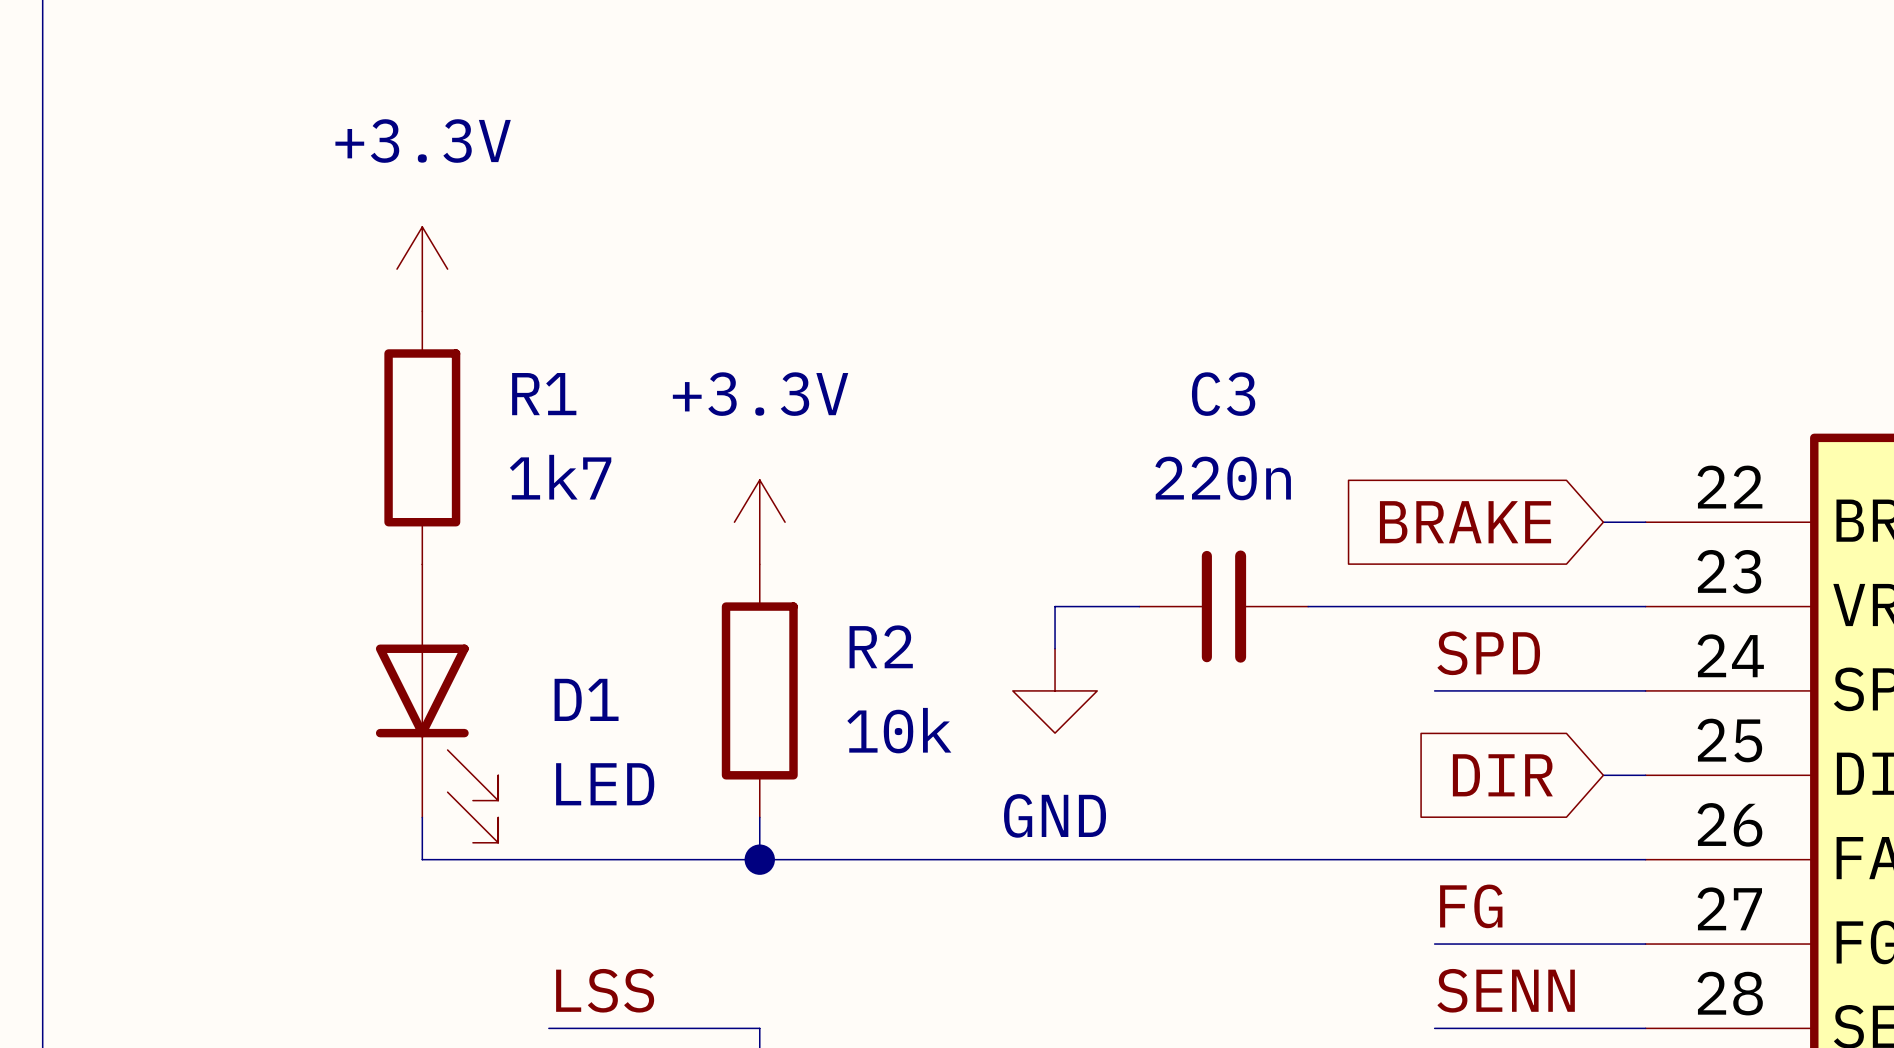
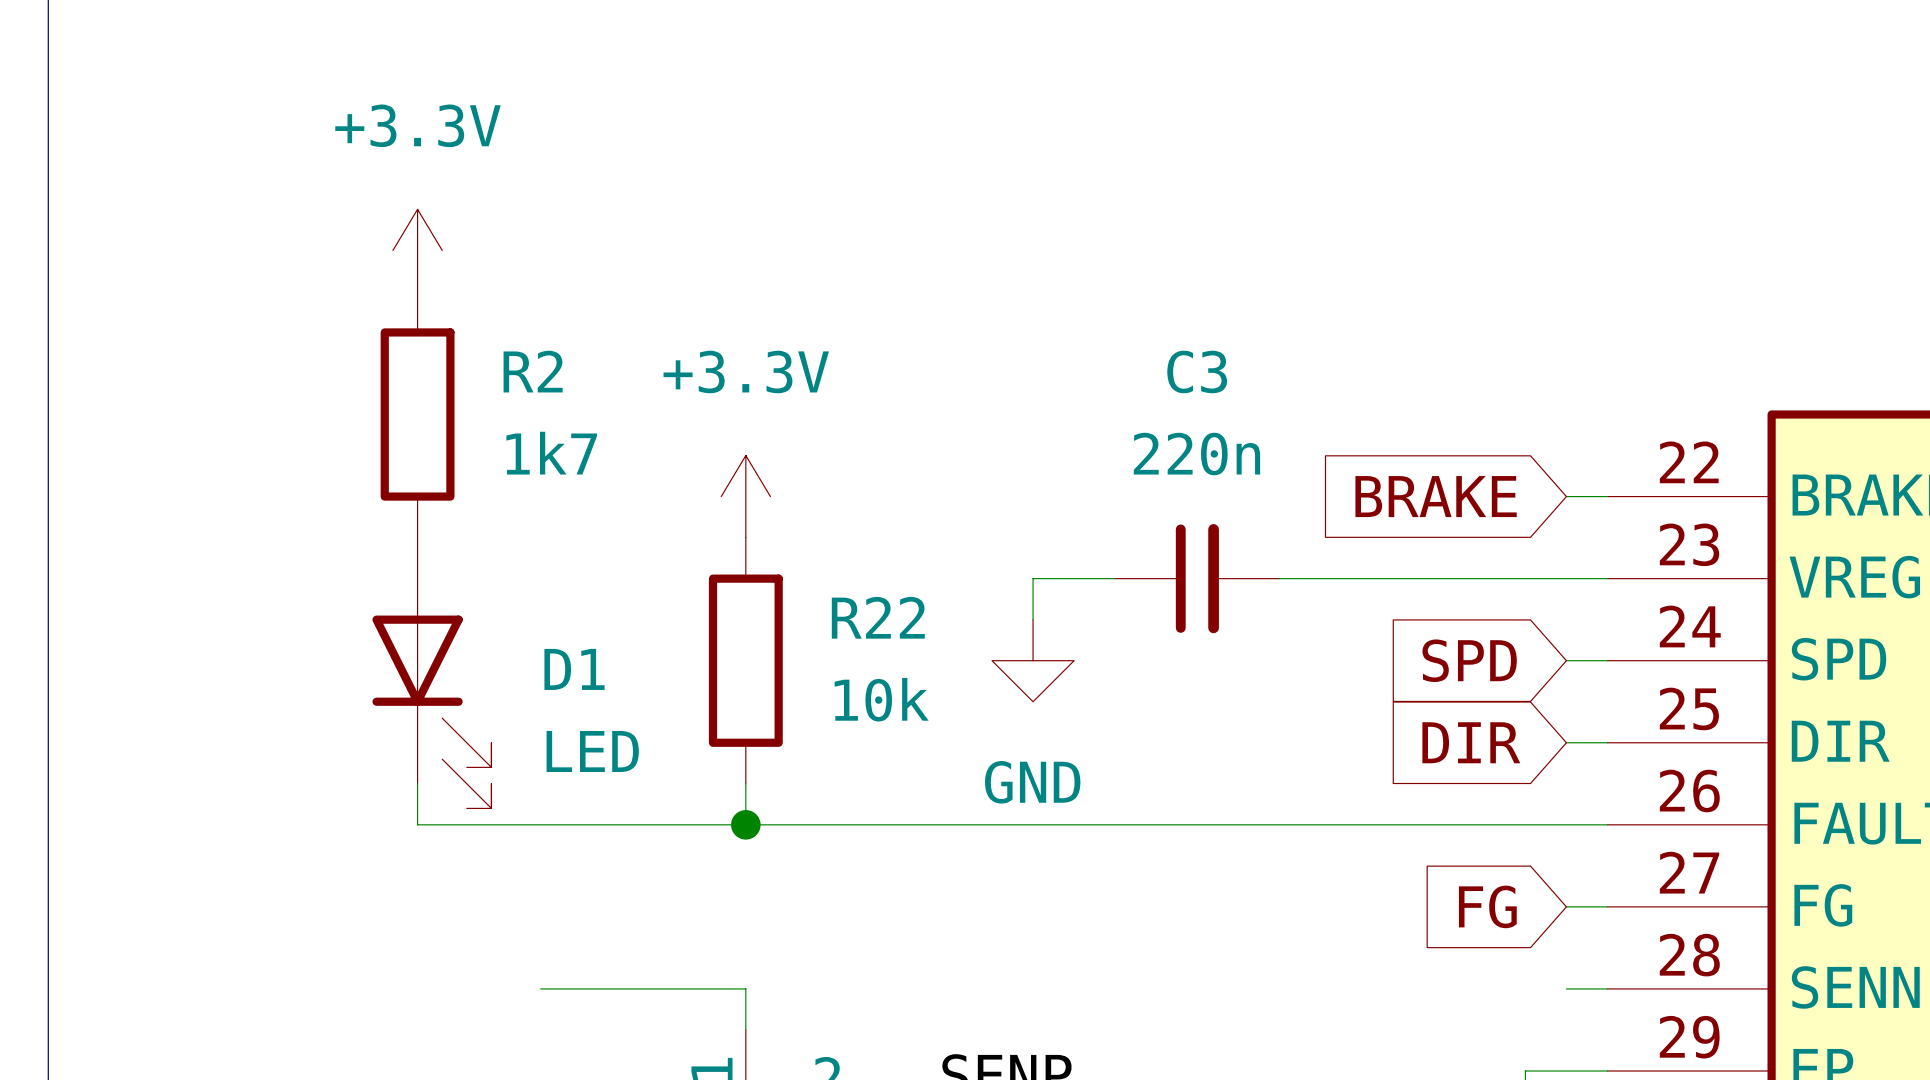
R1 name: R1 (544, 394) -> R2 (533, 371)
R2 name: R2 (881, 646) -> R22 (878, 617)
label: SPD (1488, 653) -> none
wire: (1434, 690) (1603, 690) -> none
global label: none -> SPD (1469, 660)
label: FG (1471, 906) -> none
wire: (1434, 944) (1603, 944) -> none
global label: none -> FG (1487, 906)
label: LSS (605, 990) -> none
label: SENN (1506, 990) -> none
wire: (1434, 1028) (1603, 1028) -> none

